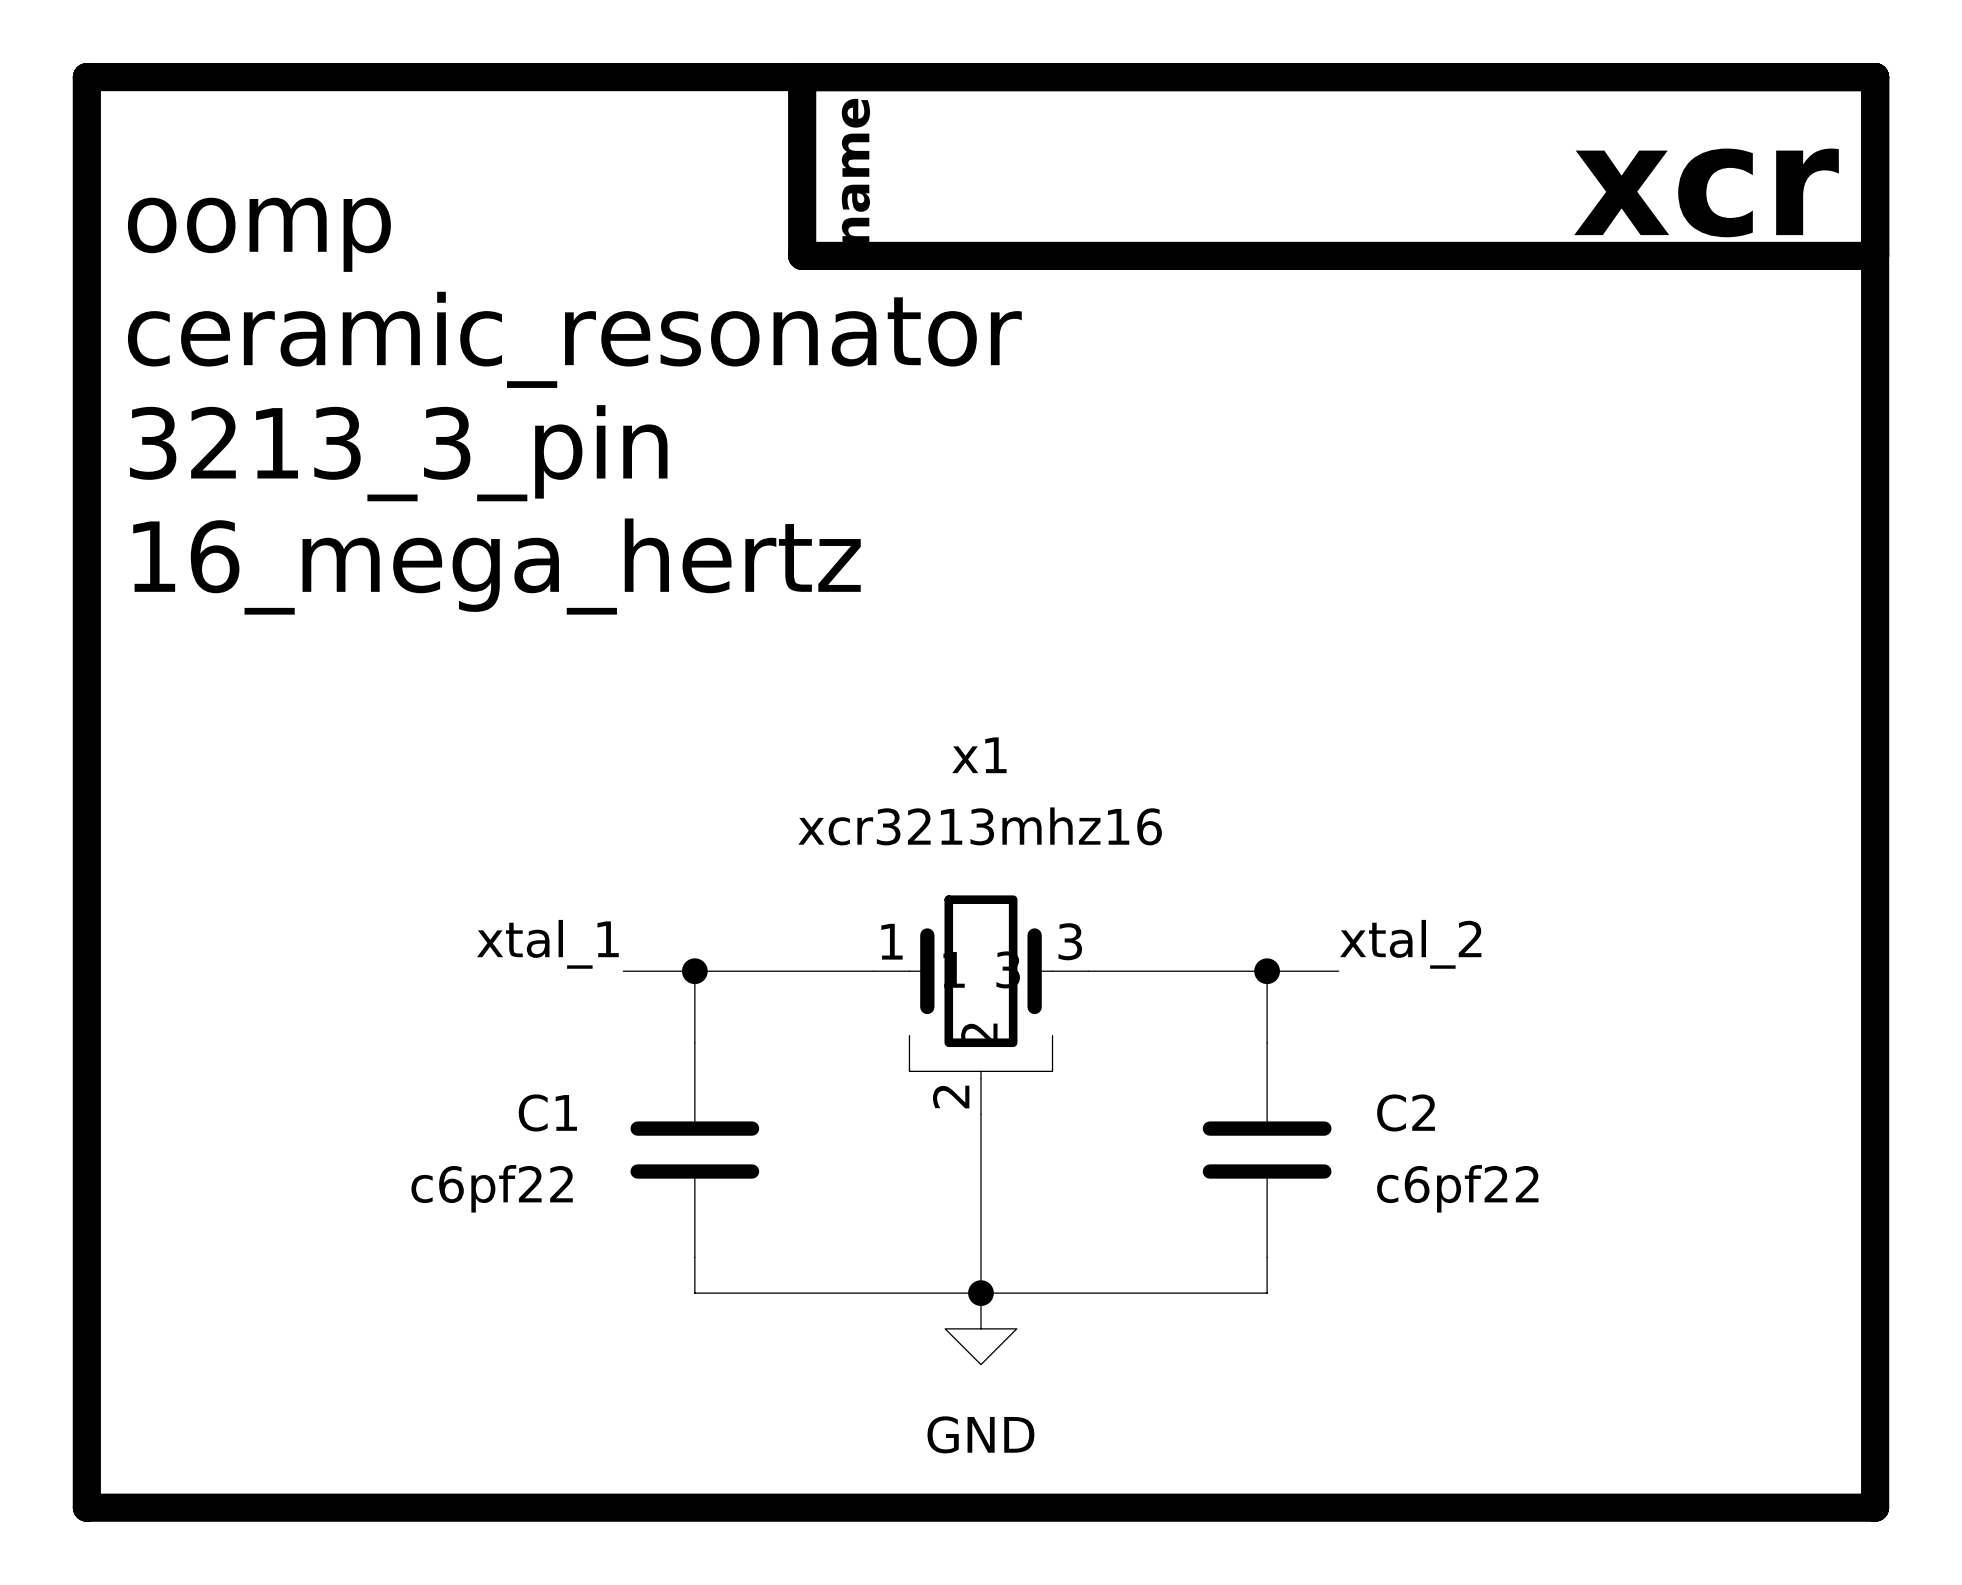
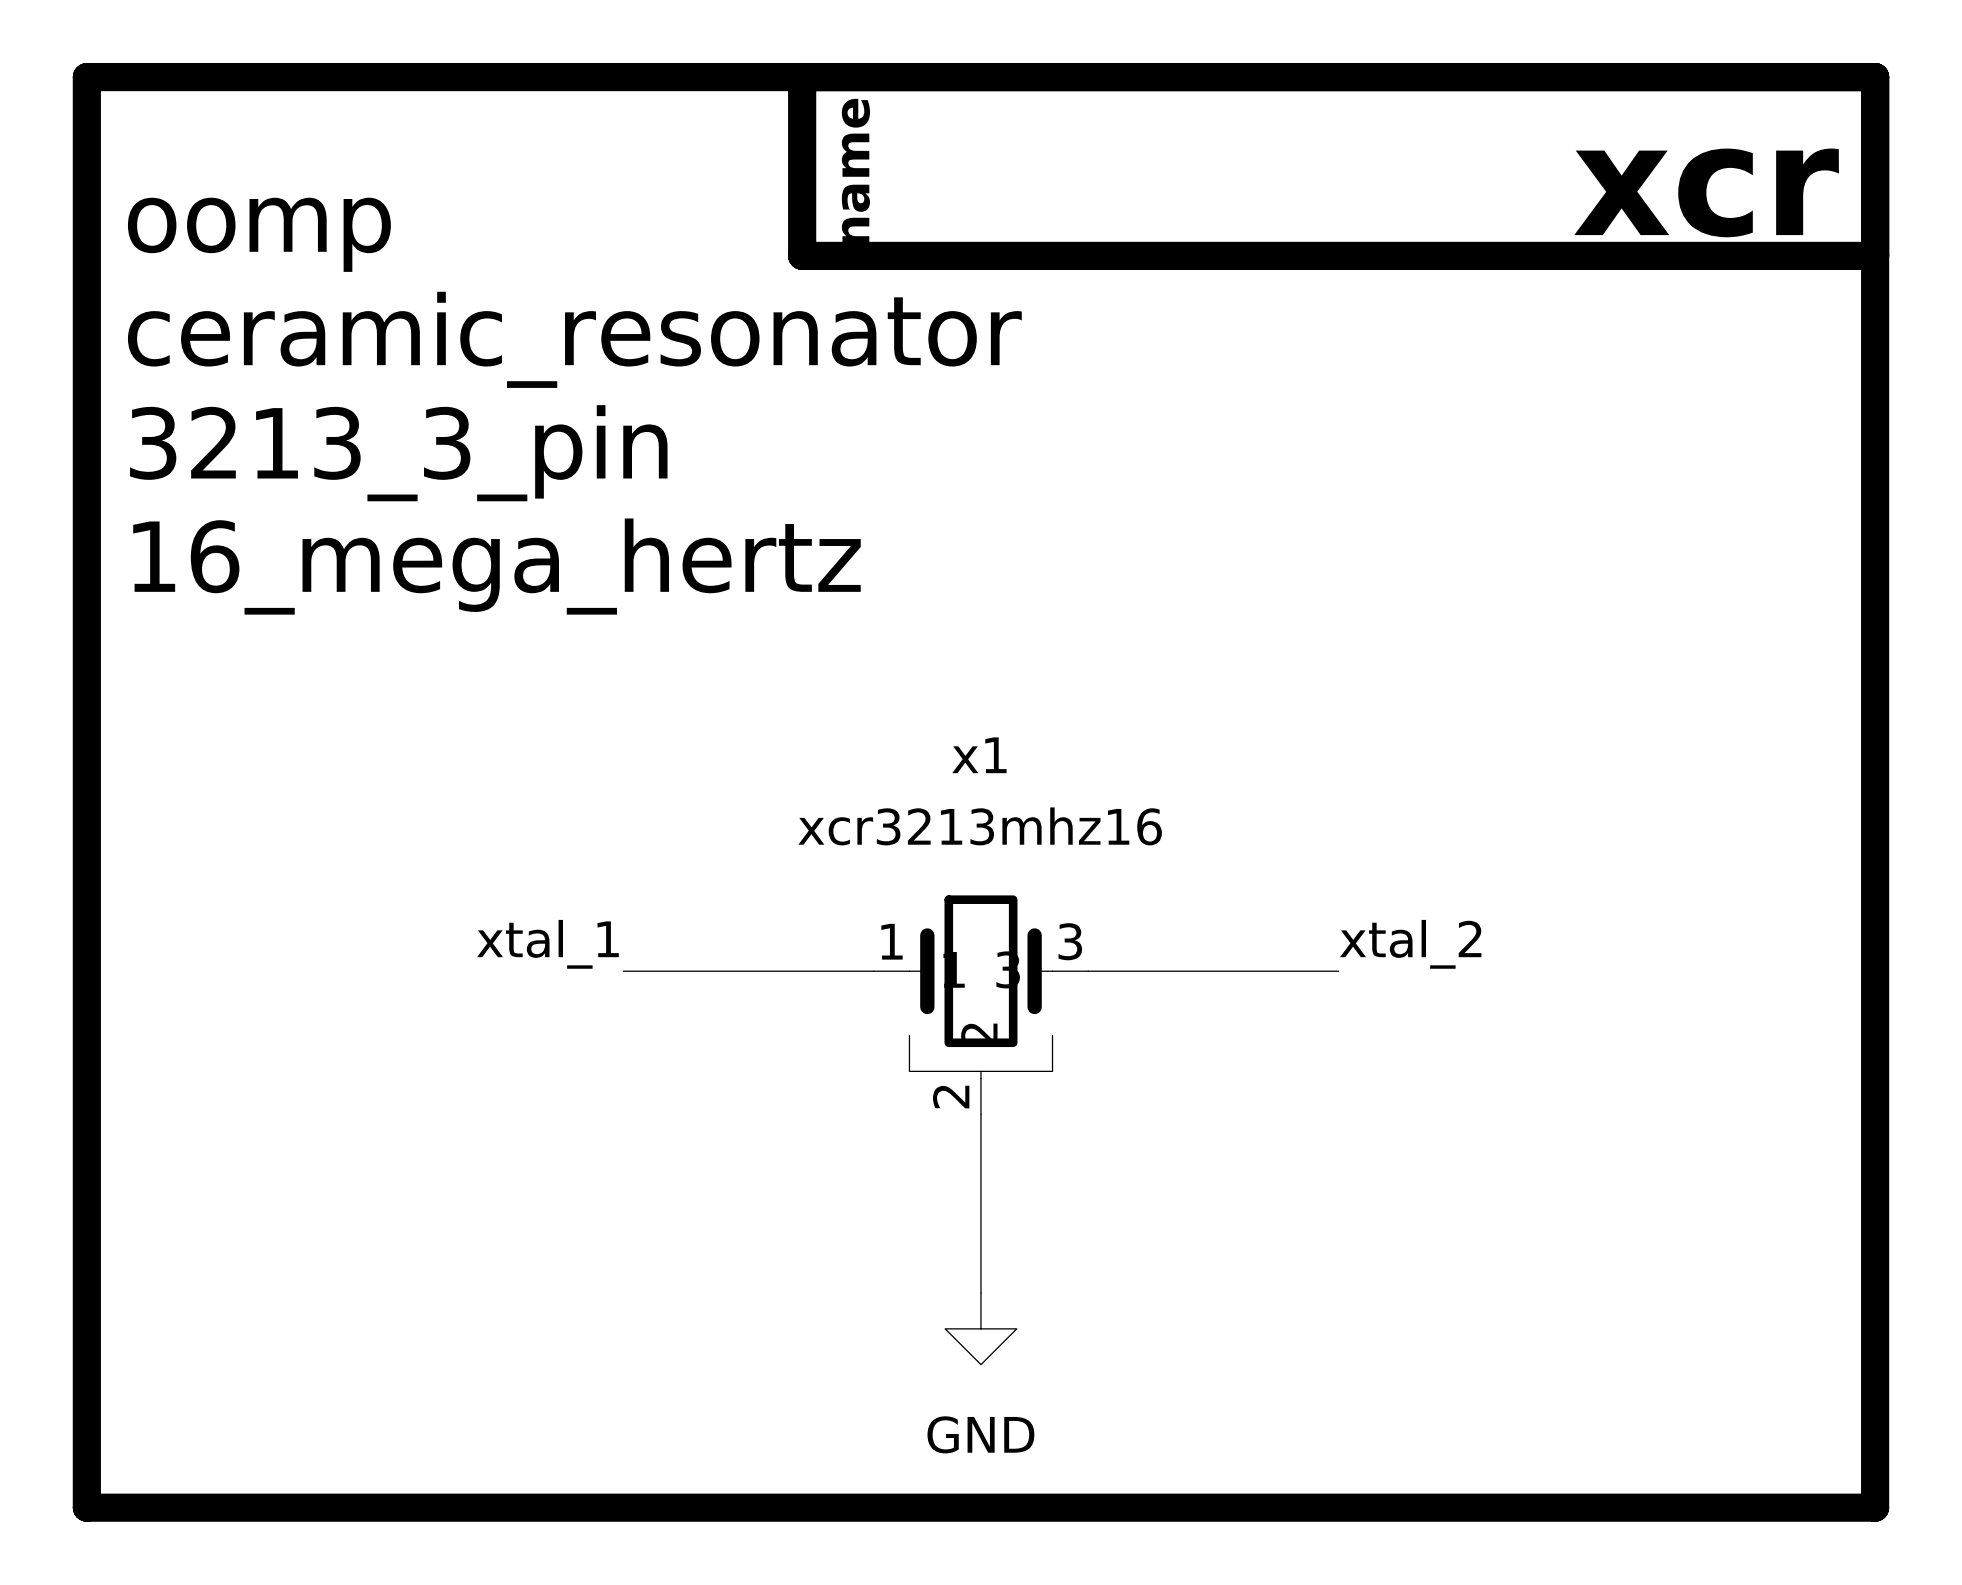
wire: (694, 971) (694, 1042) -> none
junction: (694, 971) -> none
wire: (1267, 971) (1267, 1042) -> none
junction: (1267, 971) -> none
C1: c6pf22 (694, 1150) -> none
C2: c6pf22 (1267, 1150) -> none
wire: (694, 1257) (694, 1293) (1267, 1293) (1267, 1257) -> none
junction: (980, 1293) -> none

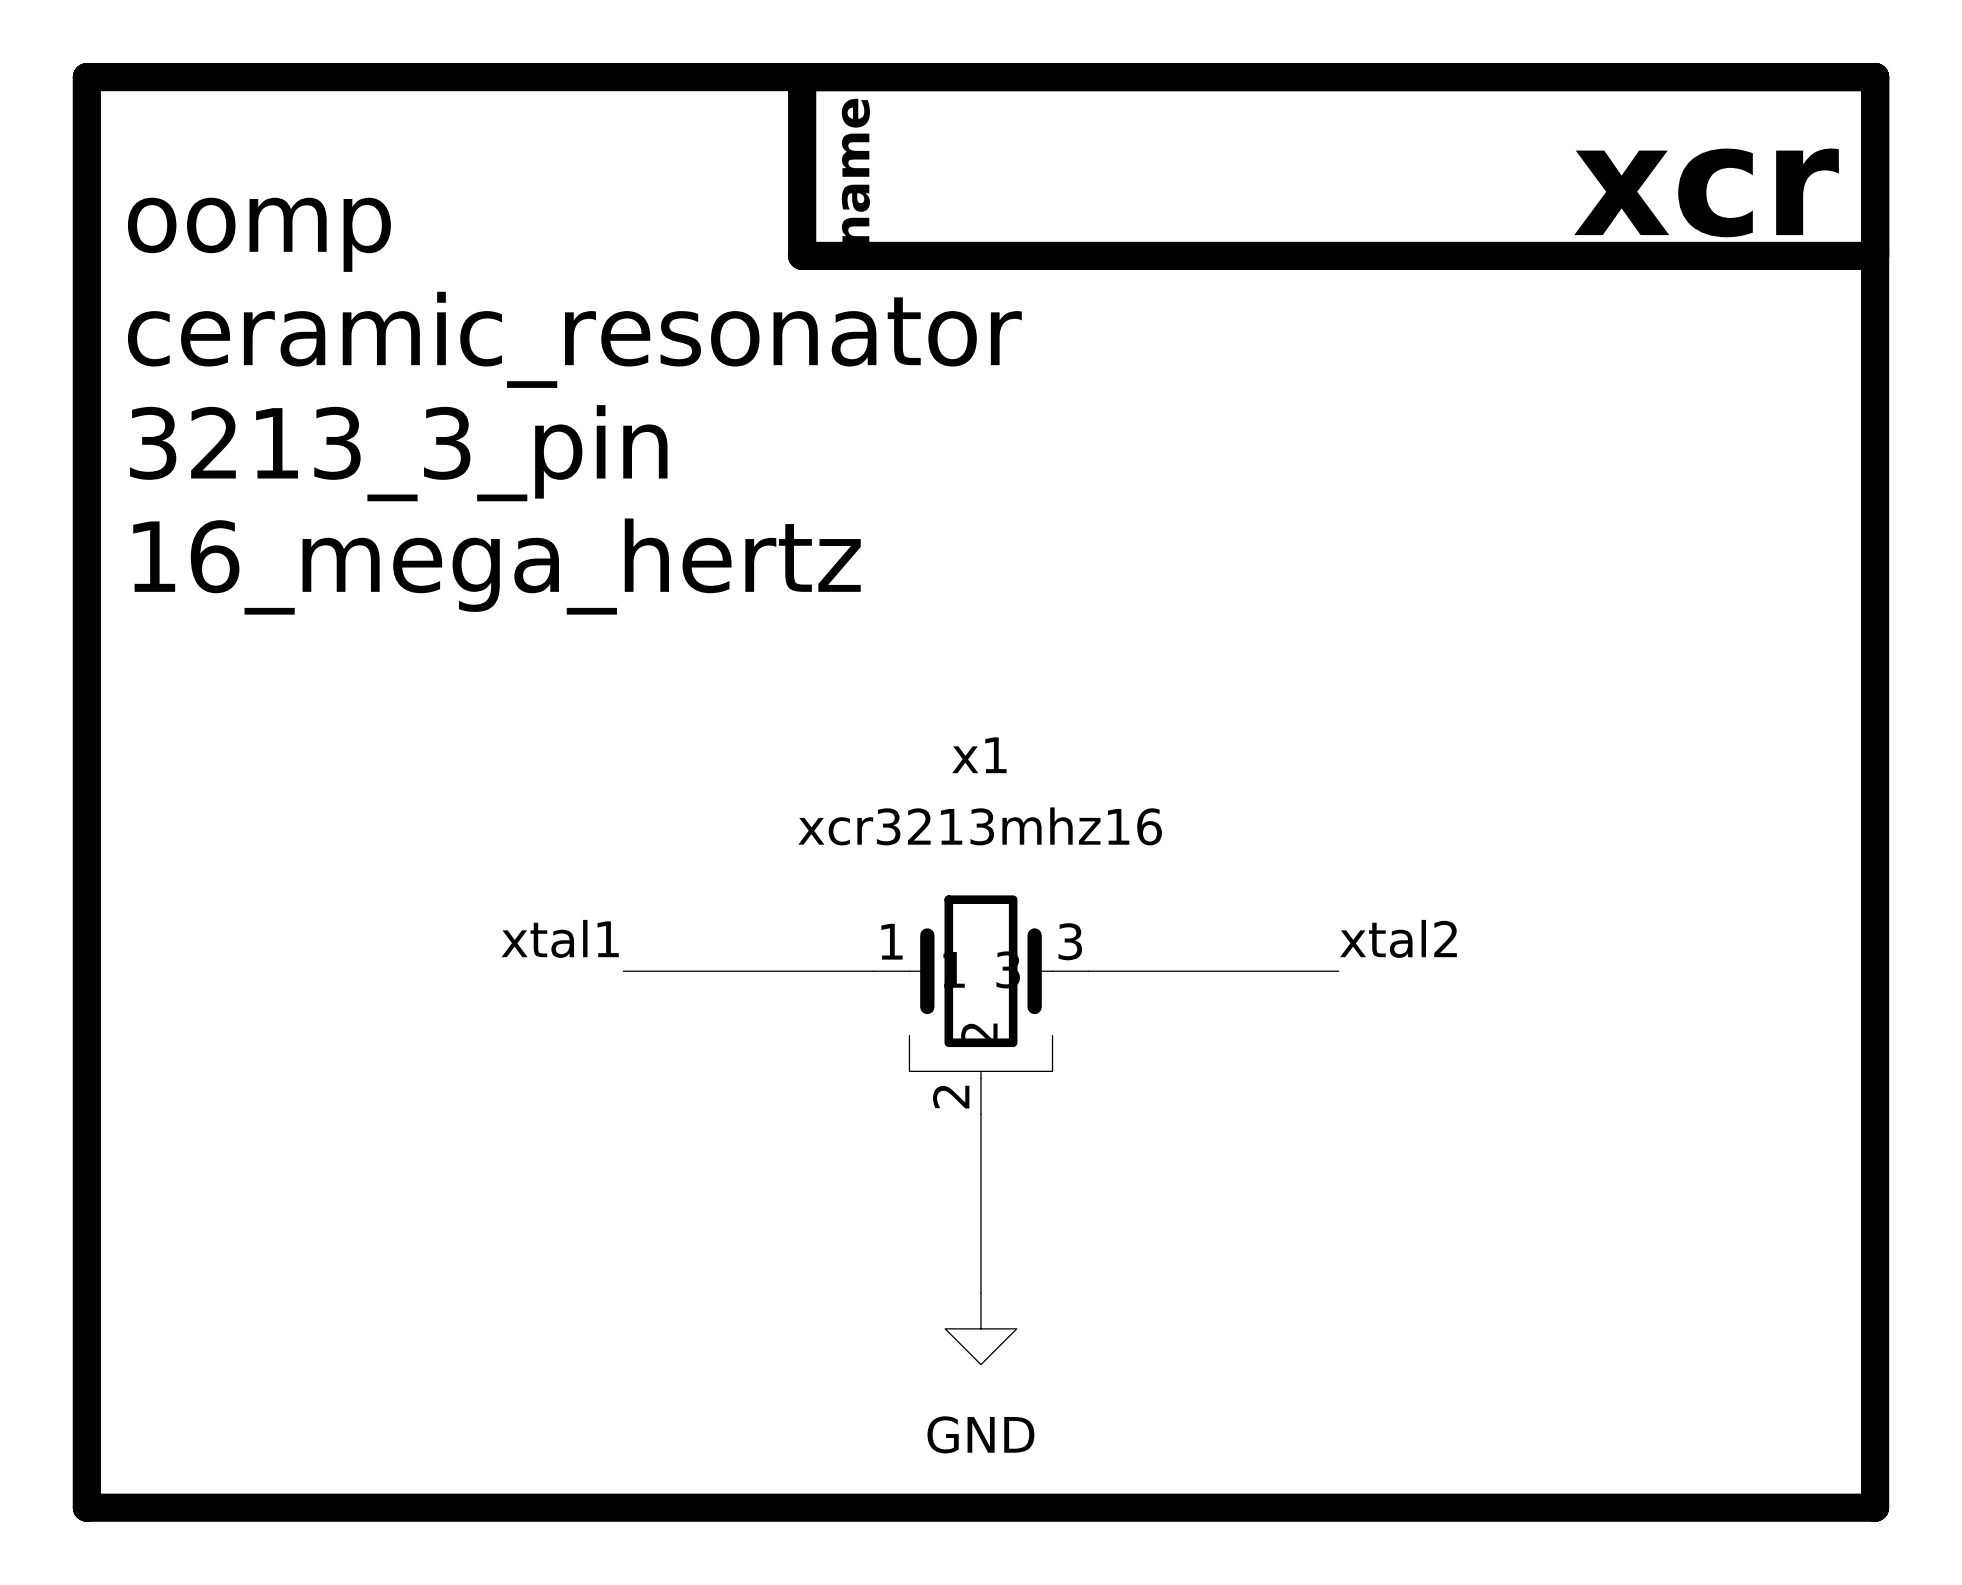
label: xtal_1 (547, 944) -> xtal1 (560, 938)
label: xtal_2 (1410, 944) -> xtal2 (1398, 938)

